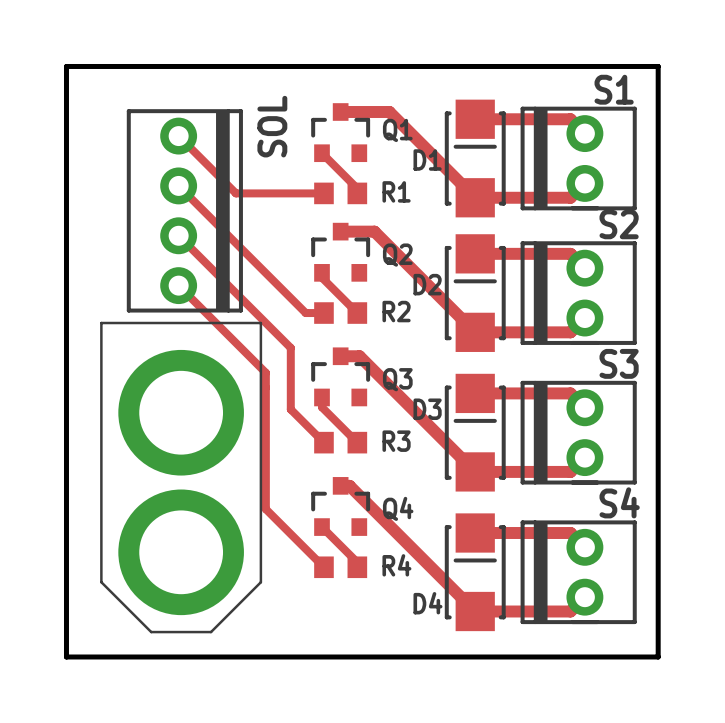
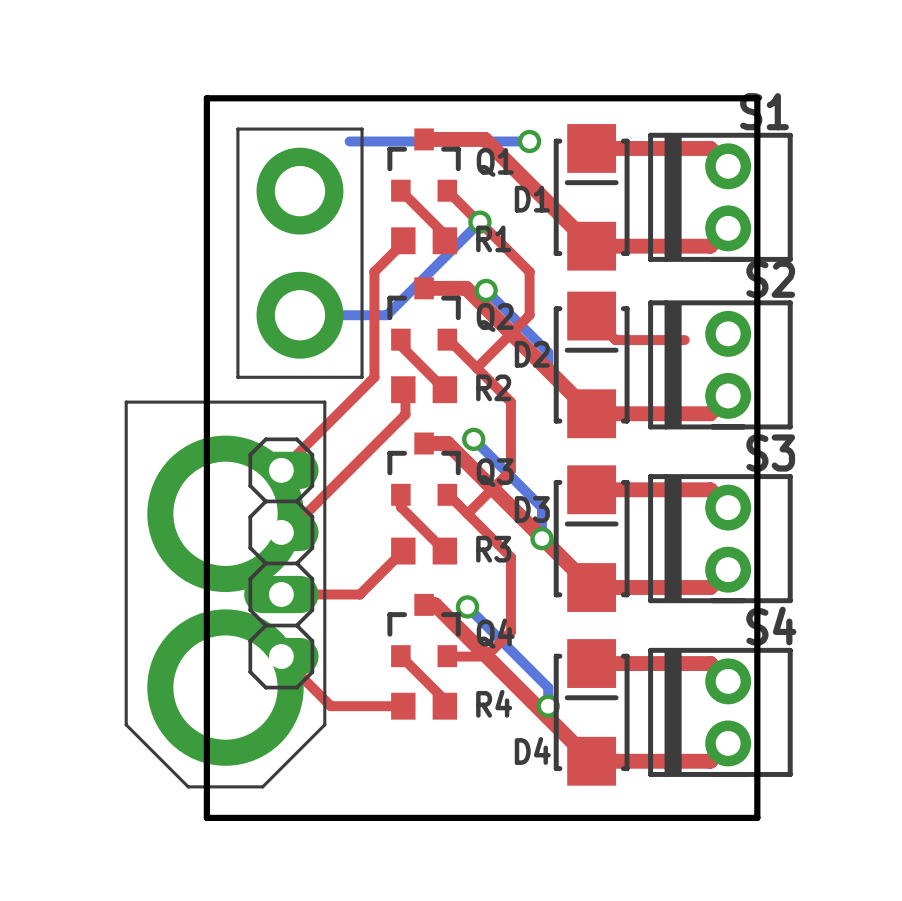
bottom track: none -> (349, 141) (529, 141)
via: none -> (529, 141)
top track: (178, 136) (235, 193) (323, 193) -> none
top track: none -> (447, 190) (529, 271) (529, 315) (476, 367)
bottom track: none -> (479, 222) (386, 315) (299, 315)
via: none -> (479, 222)
top track: (178, 185) (305, 313) (323, 313) -> (281, 532) (287, 532) (405, 414) (405, 391) (403, 389)
top track: none -> (403, 242) (374, 271) (374, 377) (281, 470)
part: none -> (299, 253)
SOL: (184, 210) -> none
bottom track: none -> (486, 290) (548, 352) (548, 364)
via: none -> (486, 290)
top track: (178, 235) (290, 347) (290, 409) (323, 442) -> (281, 594) (359, 594) (403, 551)
top track: (475, 253) (570, 253) (584, 268) -> (591, 316) (615, 340) (684, 340)
top track: none -> (447, 339) (510, 402) (510, 470) (467, 513)
top track: (178, 285) (265, 372) (265, 509) (323, 567) -> (281, 656) (331, 706) (403, 706)
bottom track: none -> (473, 439) (541, 507) (541, 538)
via: none -> (473, 439)
top track: none -> (447, 494) (510, 557) (510, 631) (486, 656) (447, 656)
via: none -> (541, 538)
part: none -> (281, 563)
bottom track: none -> (467, 606) (548, 687) (548, 706)
via: none -> (467, 606)
via: none -> (548, 706)
board edge: (166, 656) (66, 656) (66, 66) (658, 66) (658, 656) (608, 656) -> (206, 817) (206, 98) (757, 98) (757, 817)

